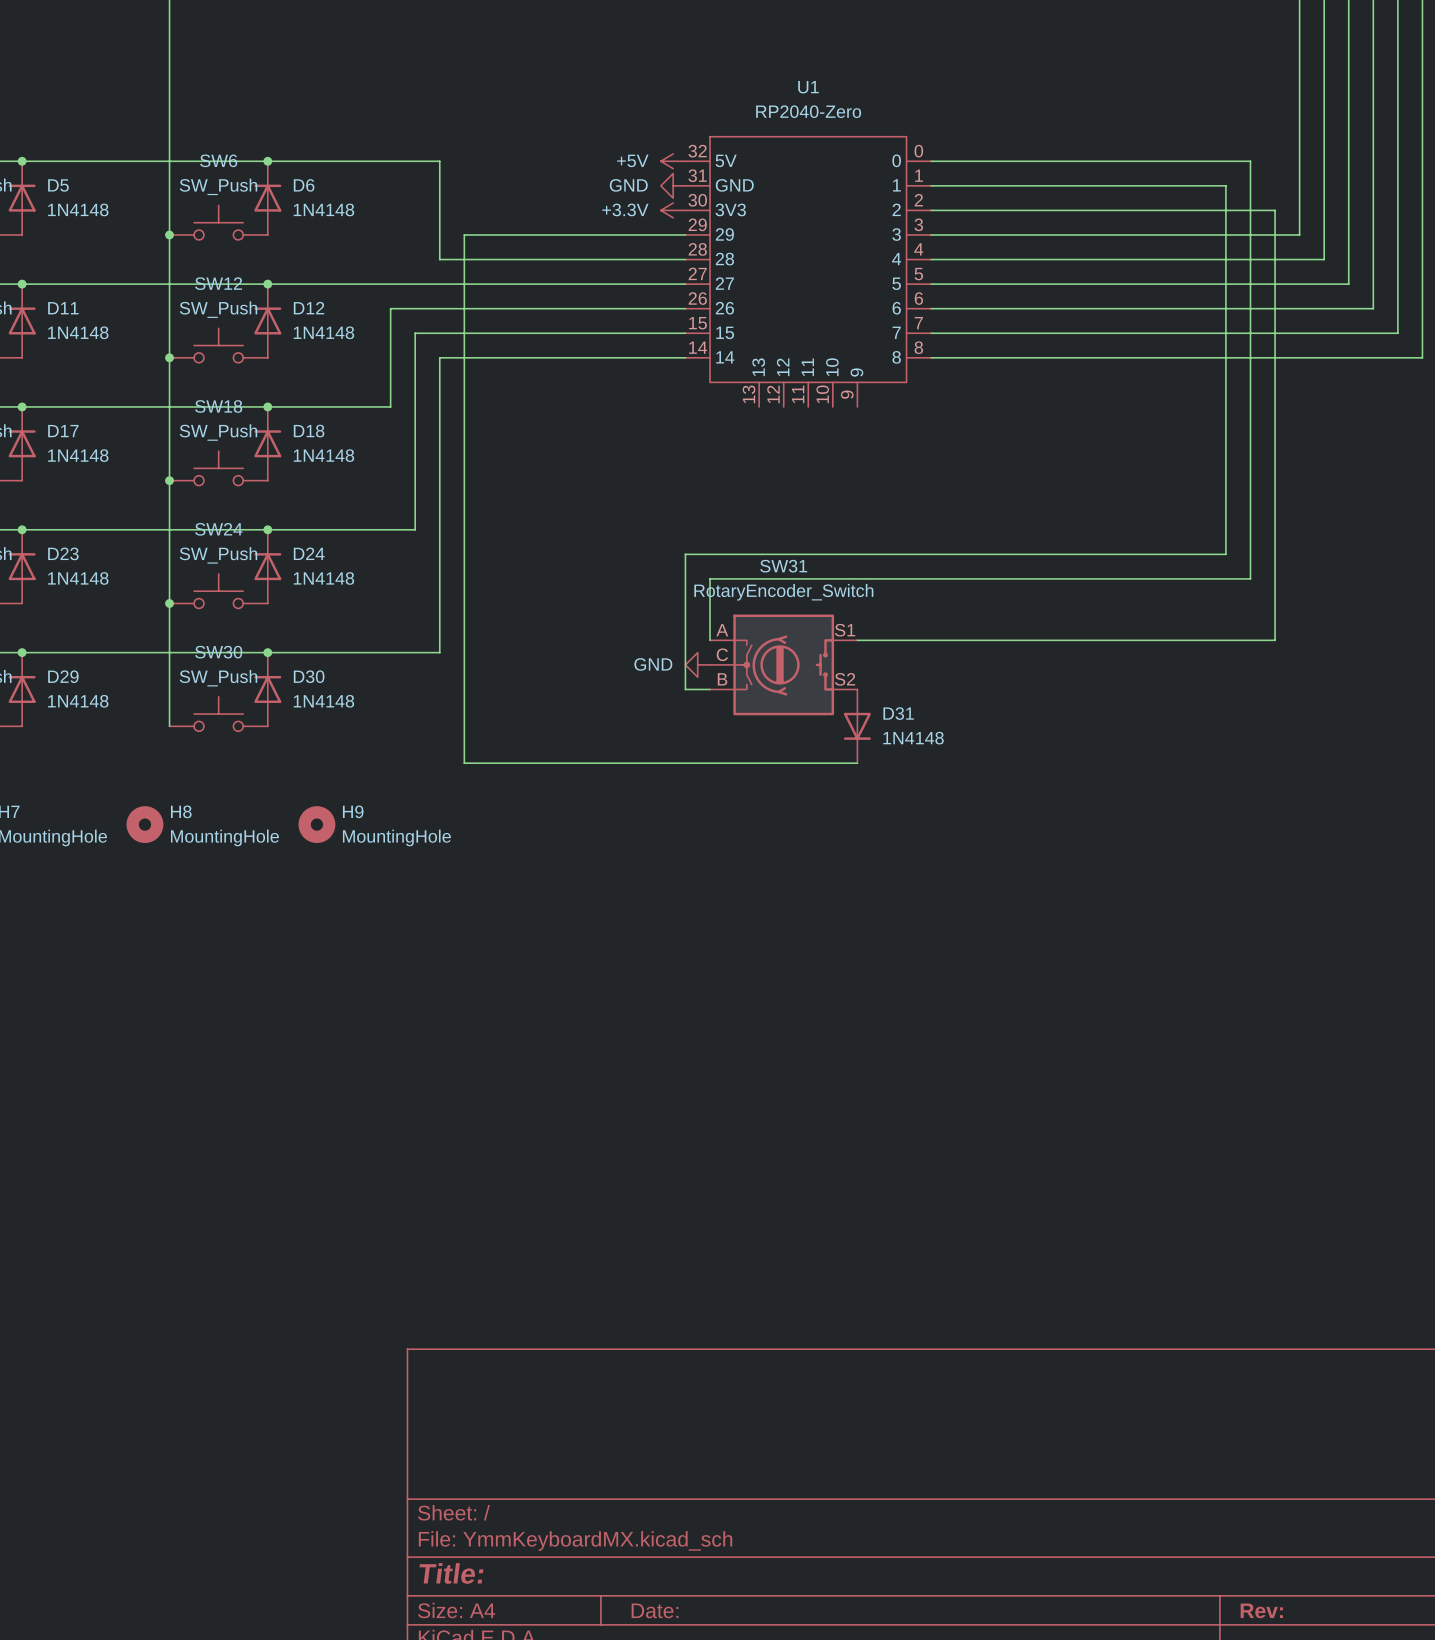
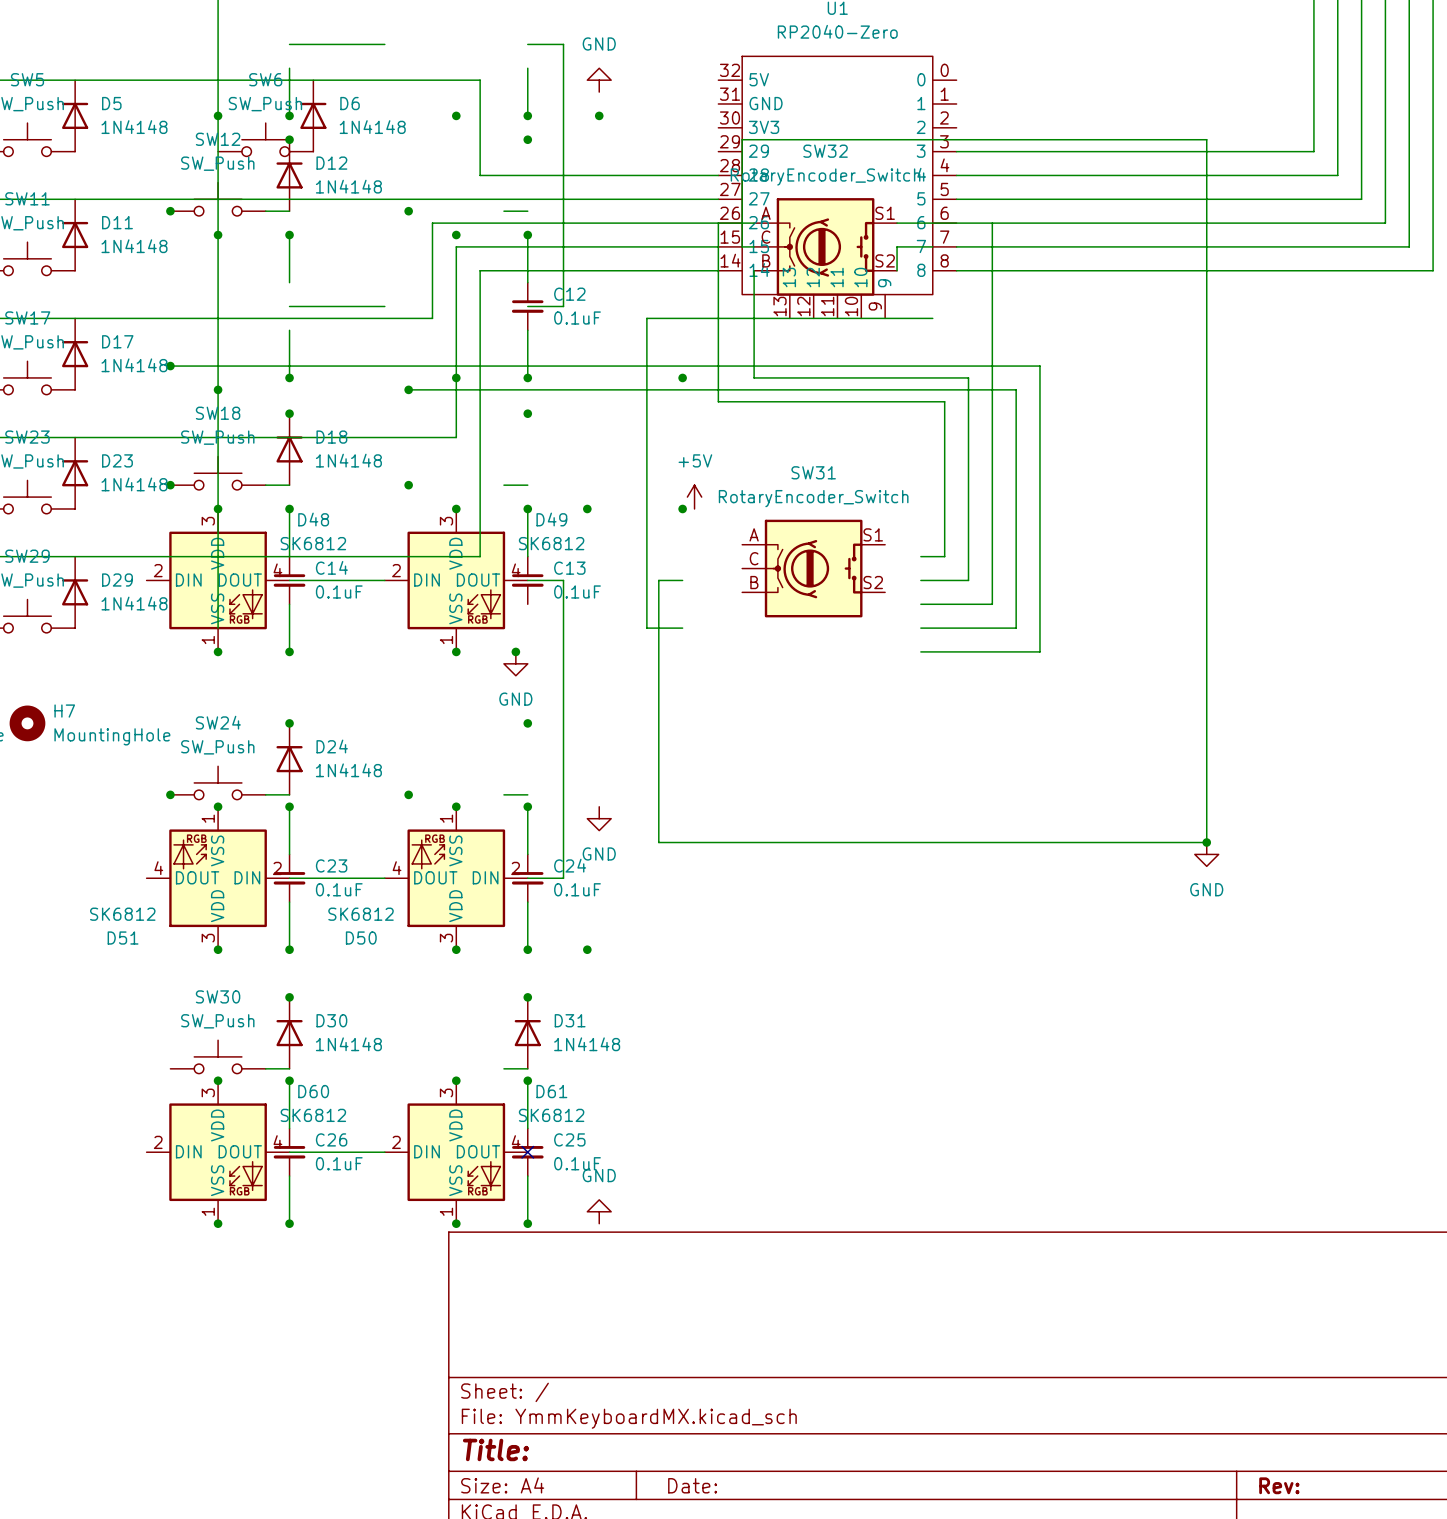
wire: none -> (289, 44) (384, 44)
wire: none -> (527, 44) (563, 44) (563, 306) (527, 306)
wire: none -> (289, 68) (289, 115)
wire: none -> (527, 68) (527, 115)
junction: (22, 161) -> none
junction: (267, 161) -> none
power symbol: +5V (673, 161) -> none
wire: (931, 161) (1250, 161) (1250, 578) (710, 578) (710, 640) -> none
power symbol rotation: 0° (673, 185) -> 90° clockwise (599, 80)
power symbol position: GND (673, 185) -> GND (599, 80)
wire: (931, 185) (1225, 185) (1225, 554) (685, 554) (685, 689) (710, 689) -> none
junction: none -> (289, 115)
junction: none -> (456, 115)
junction: none -> (527, 115)
junction: none -> (599, 115)
power symbol: +3.3V (673, 210) -> none
wire: (931, 210) (1275, 210) (1275, 640) (857, 640) -> none
junction: none -> (289, 139)
junction: none -> (527, 139)
junction position: (169, 234) -> (218, 115)
wire: (685, 234) (464, 234) (464, 763) (857, 763) -> none
junction: (22, 284) -> none
junction: (267, 284) -> none
junction: none -> (170, 211)
wire: none -> (265, 211) (289, 211)
junction: none -> (408, 211)
wire: none -> (503, 211) (527, 211)
wire: none -> (754, 223) (718, 223) (718, 401) (944, 401) (944, 556) (920, 556)
wire: none -> (897, 223) (956, 223)
wire: none -> (992, 223) (992, 604) (920, 604)
wire: none -> (289, 235) (289, 282)
junction: none -> (289, 235)
D12 position: (267, 320) -> (289, 175)
junction: none -> (456, 235)
wire: none -> (527, 235) (527, 282)
junction: none -> (527, 235)
wire: none -> (754, 246) (742, 246) (742, 139) (1206, 139) (1206, 842) (658, 842) (658, 580) (682, 580)
SW32: none -> RotaryEncoder_Switch (825, 246)
wire: none -> (932, 246) (897, 246) (897, 270)
SW12 position: (218, 345) -> (218, 199)
junction position: (169, 357) -> (218, 235)
wire: none -> (754, 270) (754, 377) (968, 377) (968, 580) (920, 580)
wire: none -> (289, 306) (384, 306)
C12: none -> 0.1uF (527, 306)
junction: (22, 406) -> none
junction: (267, 406) -> none
wire: none -> (932, 318) (646, 318) (646, 628) (682, 628)
wire: none -> (289, 330) (289, 377)
wire: none -> (527, 330) (527, 377)
D18 position: (267, 443) -> (289, 449)
wire: none -> (170, 366) (1039, 366) (1039, 651) (920, 651)
junction: none -> (170, 366)
SW18 position: (218, 468) -> (218, 473)
junction: none -> (289, 377)
junction: none -> (456, 377)
junction: none -> (527, 377)
junction: none -> (682, 377)
wire: none -> (408, 389) (1016, 389) (1016, 628) (920, 628)
junction: none -> (408, 389)
junction: none -> (289, 413)
junction: none -> (527, 413)
junction: (22, 529) -> none
junction: (267, 529) -> none
D24 position: (267, 566) -> (289, 759)
junction: none -> (170, 485)
wire: none -> (265, 485) (289, 485)
junction: none -> (408, 485)
wire: none -> (503, 485) (527, 485)
SW24 position: (218, 591) -> (218, 782)
power symbol: none -> +5V (694, 497)
wire: none -> (289, 508) (289, 556)
junction: none -> (289, 508)
junction: none -> (456, 508)
wire: none -> (527, 508) (527, 556)
junction: none -> (527, 508)
junction: none -> (587, 508)
junction: none -> (682, 508)
junction: (22, 652) -> none
junction: (267, 652) -> none
power symbol: GND (697, 664) -> none
D48: none -> SK6812 (218, 580)
wire: none -> (289, 580) (384, 580)
C14: none -> 0.1uF (289, 580)
D49: none -> SK6812 (456, 580)
wire: none -> (527, 580) (563, 580) (563, 878) (527, 878)
C13: none -> 0.1uF (527, 580)
D30 position: (267, 689) -> (289, 1033)
wire: none -> (289, 604) (289, 651)
SW30 position: (218, 714) -> (218, 1056)
D31 rotation: 0° (857, 726) -> 180° (527, 1033)
D31 position: (857, 726) -> (527, 1033)
junction: none -> (218, 651)
junction: none -> (289, 651)
junction: none -> (456, 651)
junction: none -> (515, 651)
power symbol: none -> GND (515, 663)
H8: MountingHole (144, 824) -> none
junction: none -> (289, 723)
H9: MountingHole (316, 824) -> none
junction: none -> (527, 723)
junction: none -> (170, 794)
wire: none -> (265, 794) (289, 794)
junction: none -> (408, 794)
wire: none -> (503, 794) (527, 794)
junction: none -> (218, 806)
wire: none -> (289, 806) (289, 854)
junction: none -> (289, 806)
junction: none -> (456, 806)
wire: none -> (527, 806) (527, 854)
junction: none -> (527, 806)
power symbol: none -> GND (599, 818)
junction: none -> (1206, 842)
power symbol: none -> GND (1206, 854)
D51: none -> SK6812 (218, 878)
wire: none -> (289, 878) (384, 878)
C23: none -> 0.1uF (289, 878)
D50: none -> SK6812 (456, 878)
C24: none -> 0.1uF (527, 878)
wire: none -> (289, 902) (289, 949)
wire: none -> (527, 902) (527, 949)
junction: none -> (218, 949)
junction: none -> (289, 949)
junction: none -> (456, 949)
junction: none -> (527, 949)
junction: none -> (587, 949)
junction: none -> (289, 997)
junction: none -> (527, 997)
wire: none -> (265, 1068) (289, 1068)
wire: none -> (503, 1068) (527, 1068)
junction: none -> (218, 1080)
wire: none -> (289, 1080) (289, 1128)
junction: none -> (289, 1080)
junction: none -> (456, 1080)
wire: none -> (527, 1080) (527, 1128)
junction: none -> (527, 1080)
D60: none -> SK6812 (218, 1152)
wire: none -> (289, 1152) (384, 1152)
C26: none -> 0.1uF (289, 1152)
D61: none -> SK6812 (456, 1152)
C25: none -> 0.1uF (527, 1152)
no-connect mark: none -> (527, 1152)
wire: none -> (289, 1176) (289, 1223)
wire: none -> (527, 1176) (527, 1223)
power symbol: none -> GND (599, 1211)
junction: none -> (218, 1223)
junction: none -> (289, 1223)
junction: none -> (456, 1223)
junction: none -> (527, 1223)

